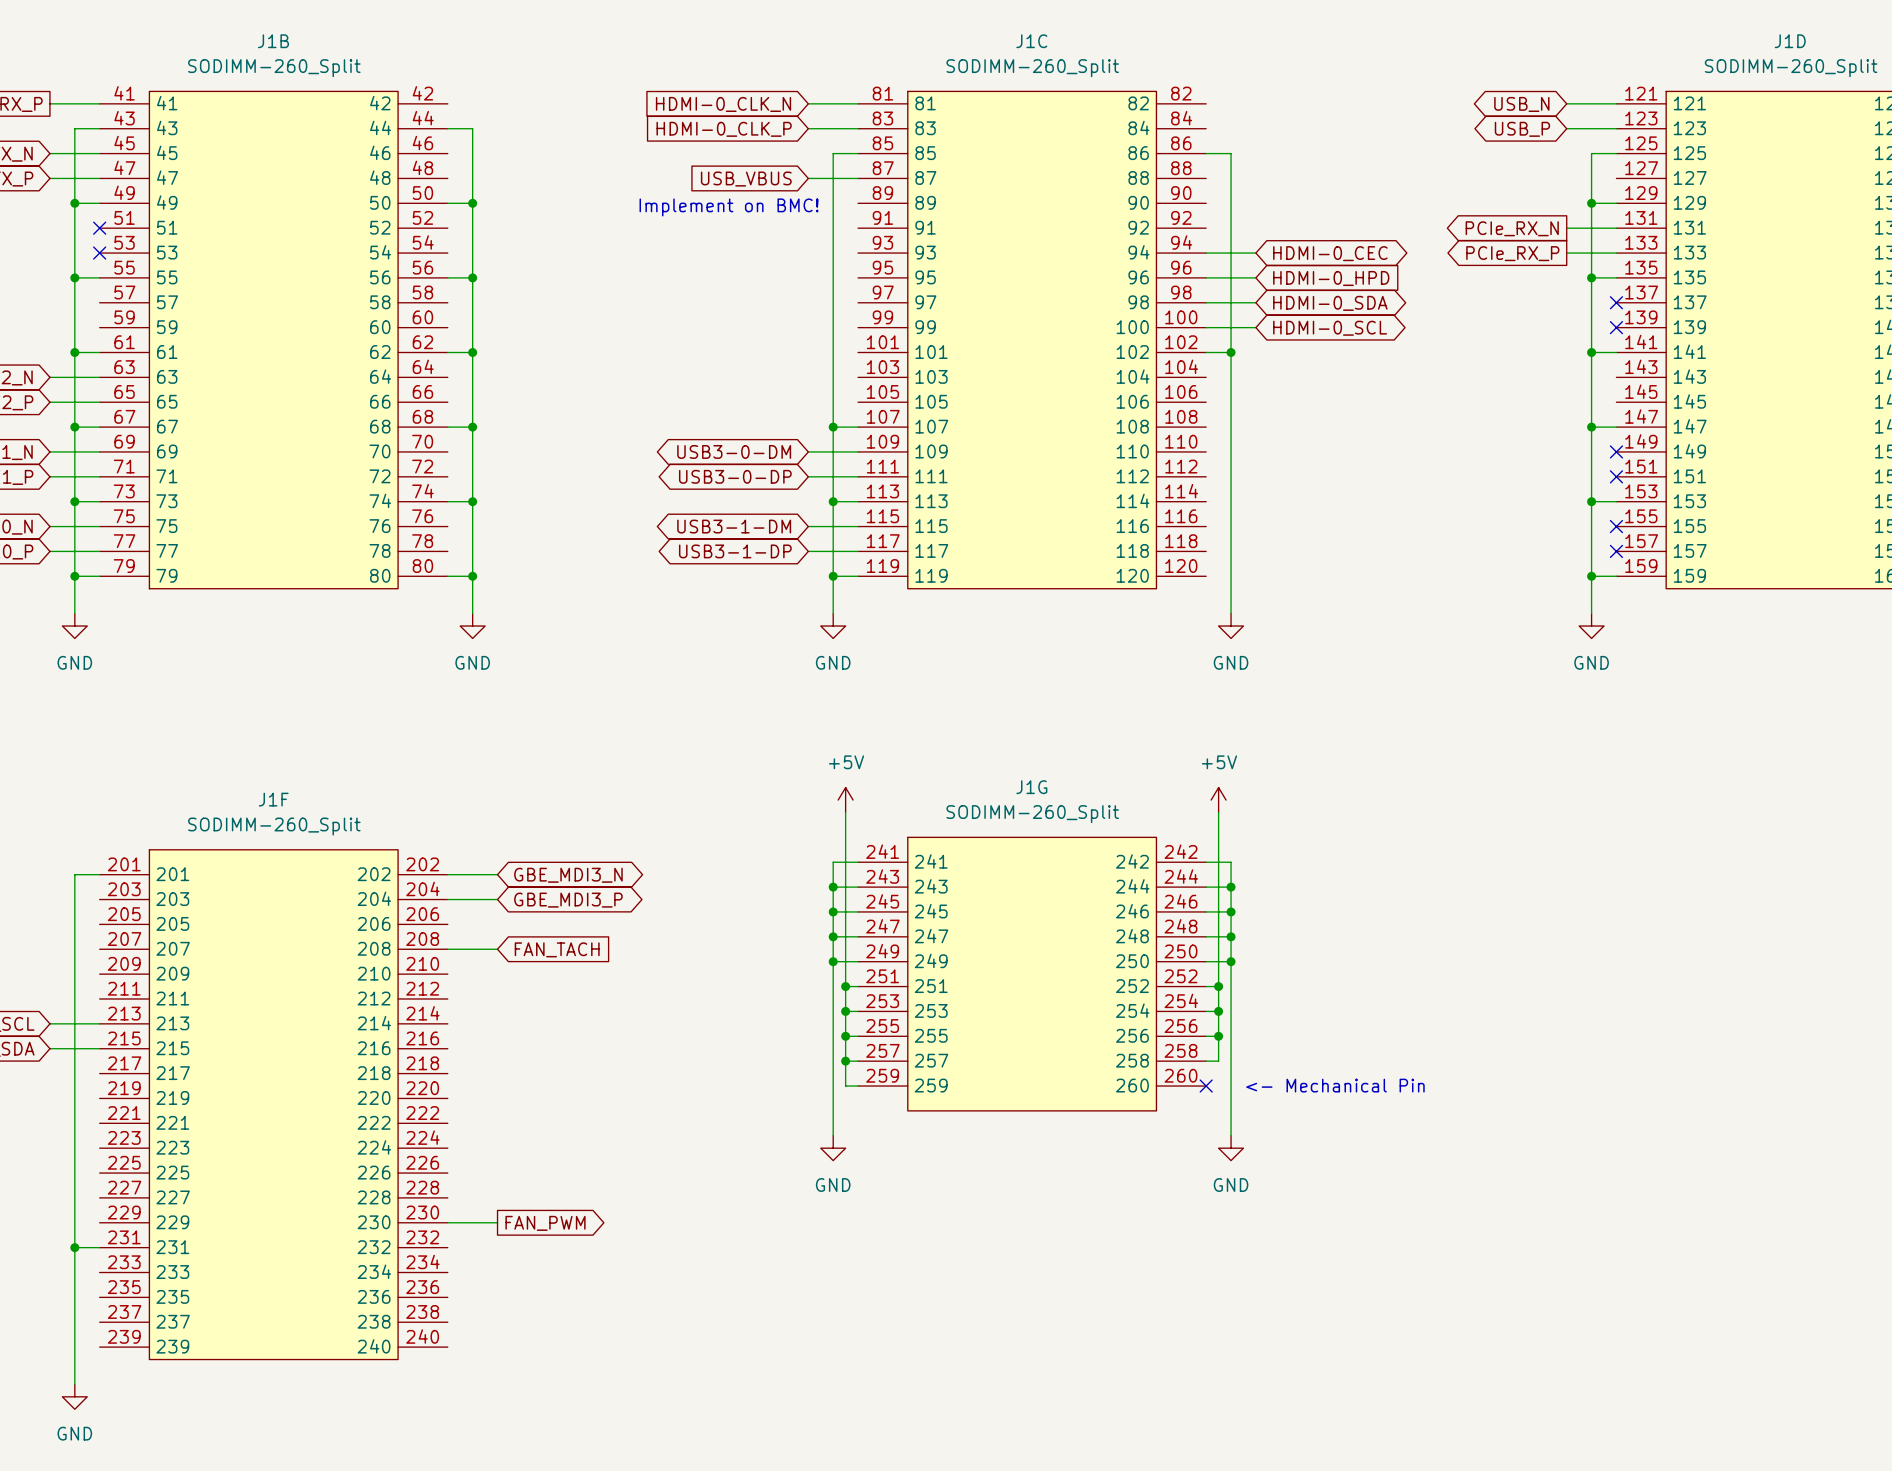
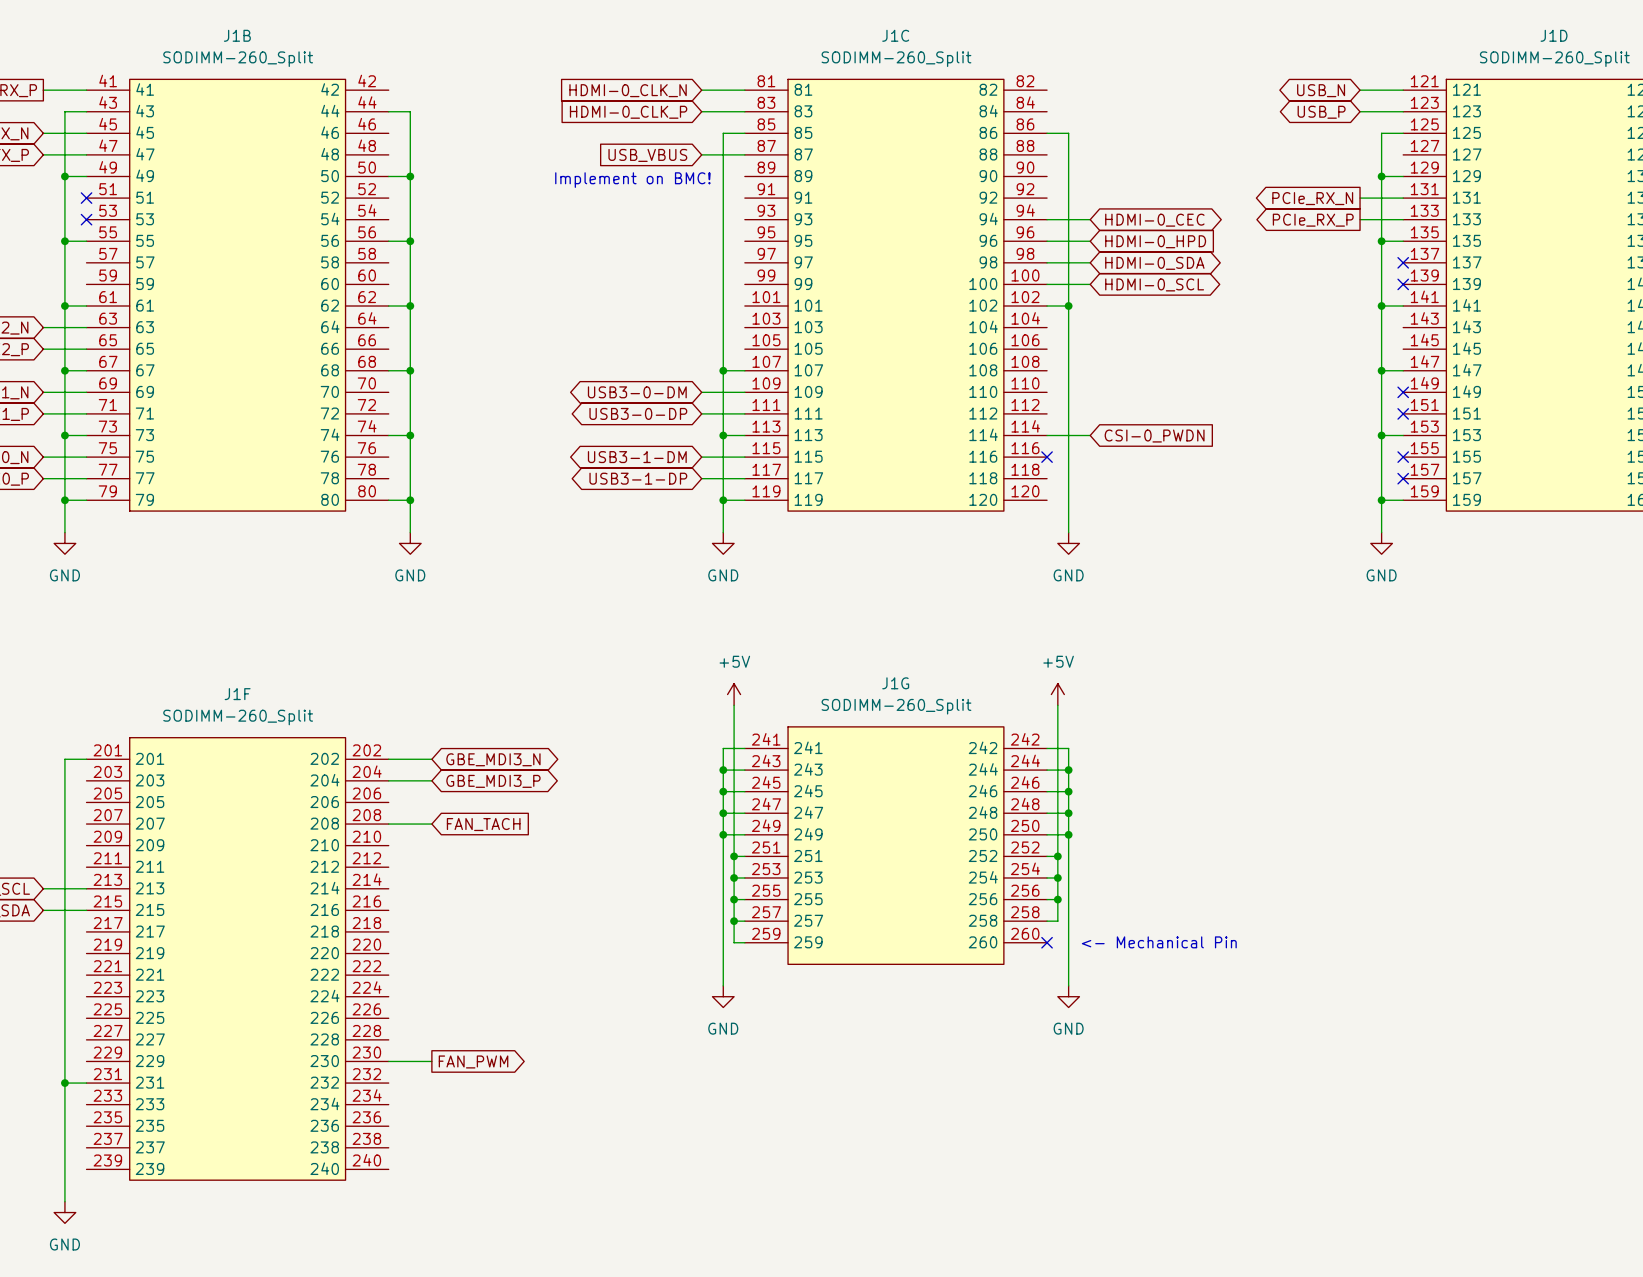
wire: none -> (1047, 435) (1090, 435)
global label: none -> CSI-0_PWDN (1154, 436)
no-connect mark: none -> (1047, 457)

